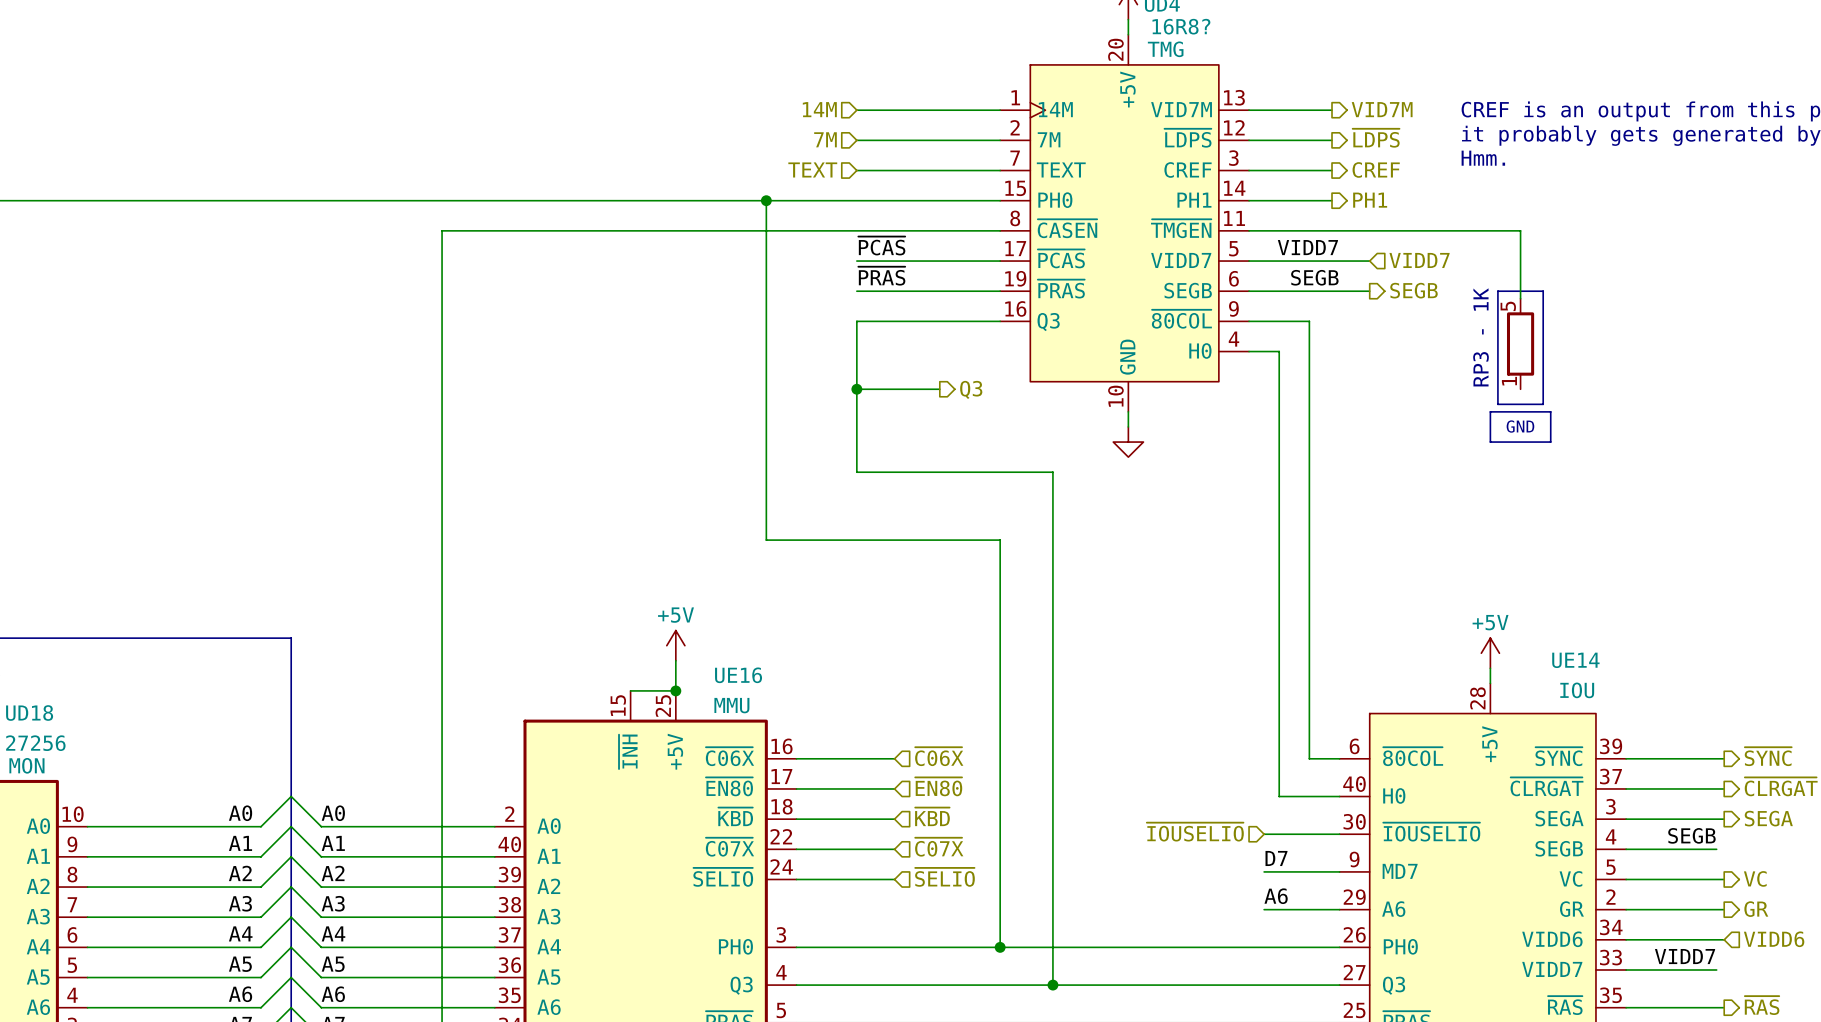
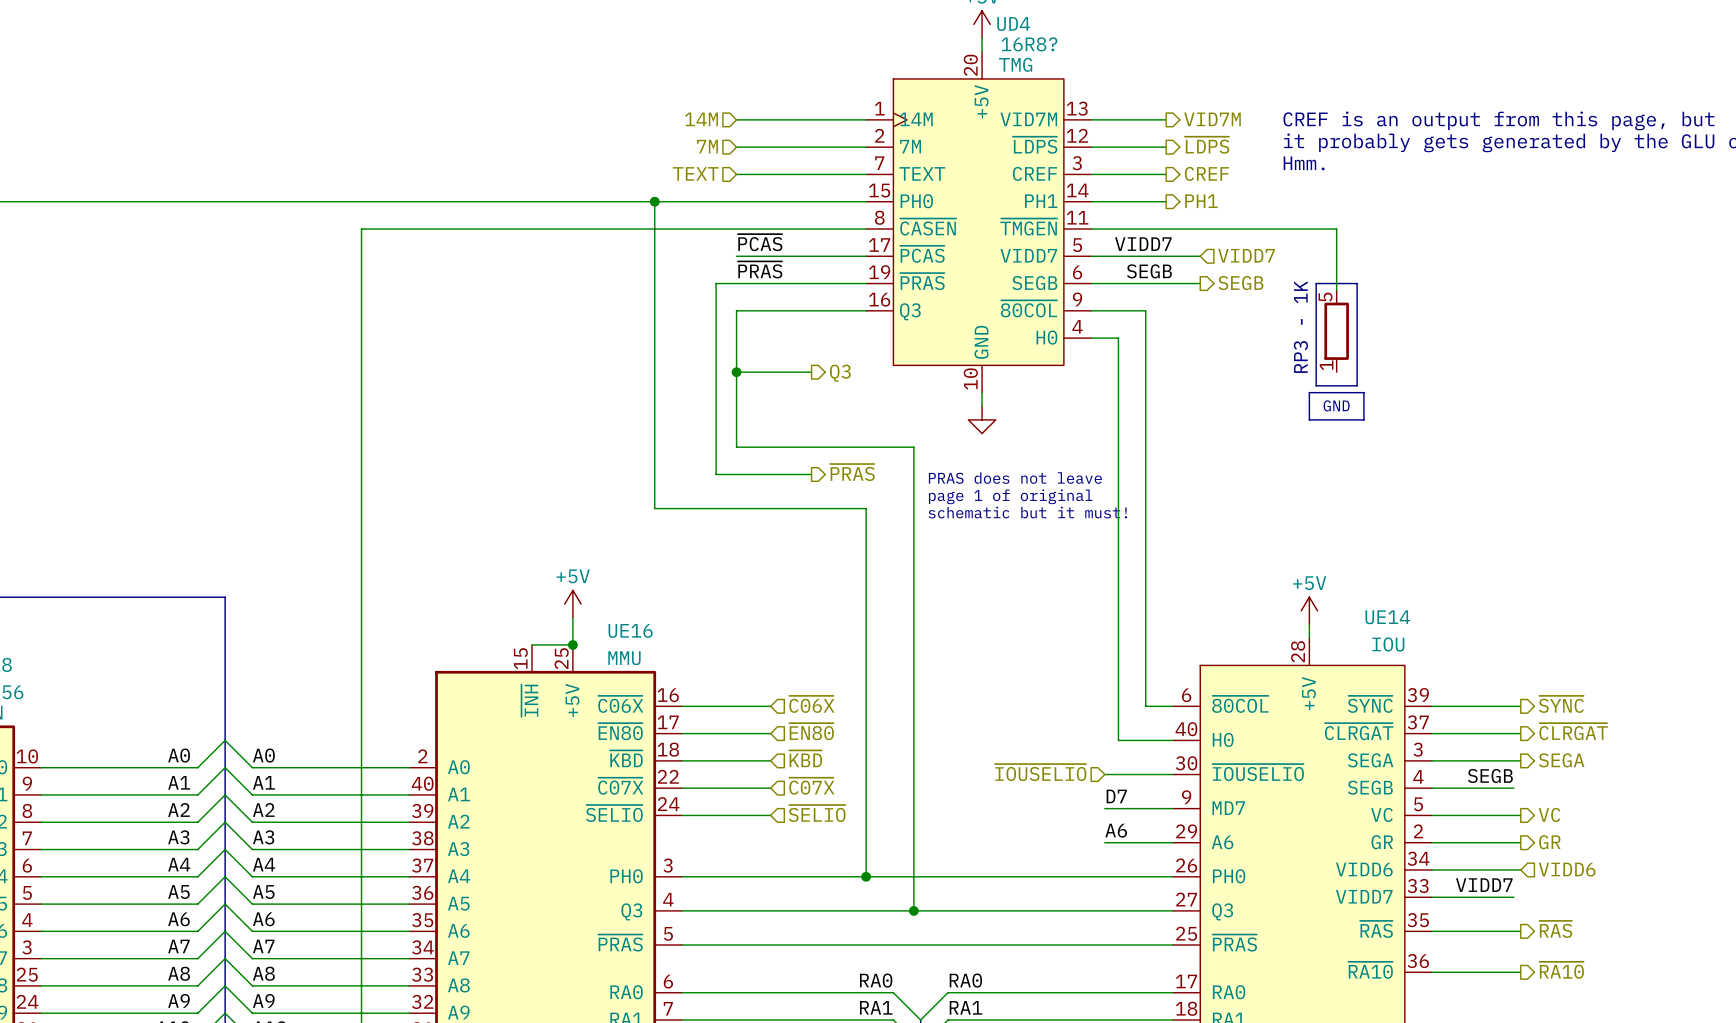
wire: none -> (736, 283) (716, 283) (716, 474) (811, 474)
hierarchical label: none -> ~{PRAS} (852, 472)
text: none -> PRAS does not leave (1015, 478)
text: none -> page 1 of original (1010, 496)
text: none -> schematic but it must! (1027, 512)

